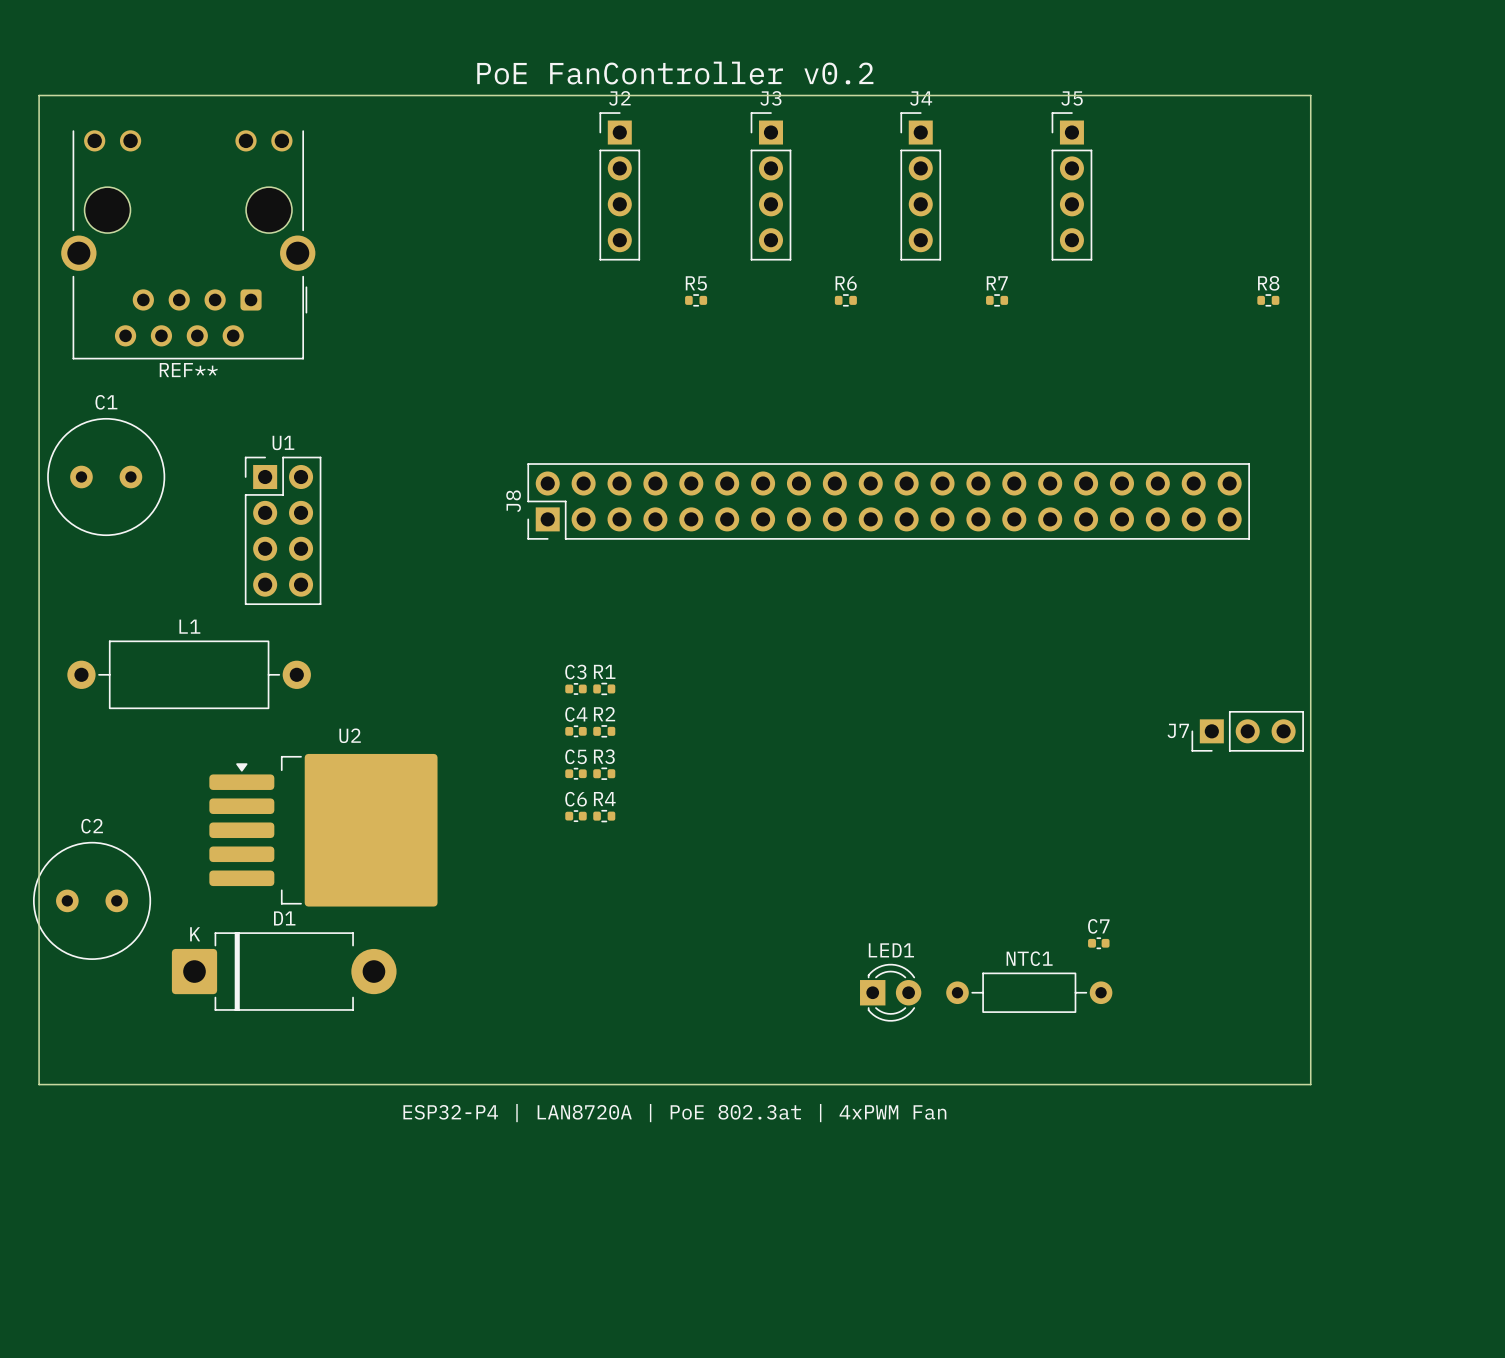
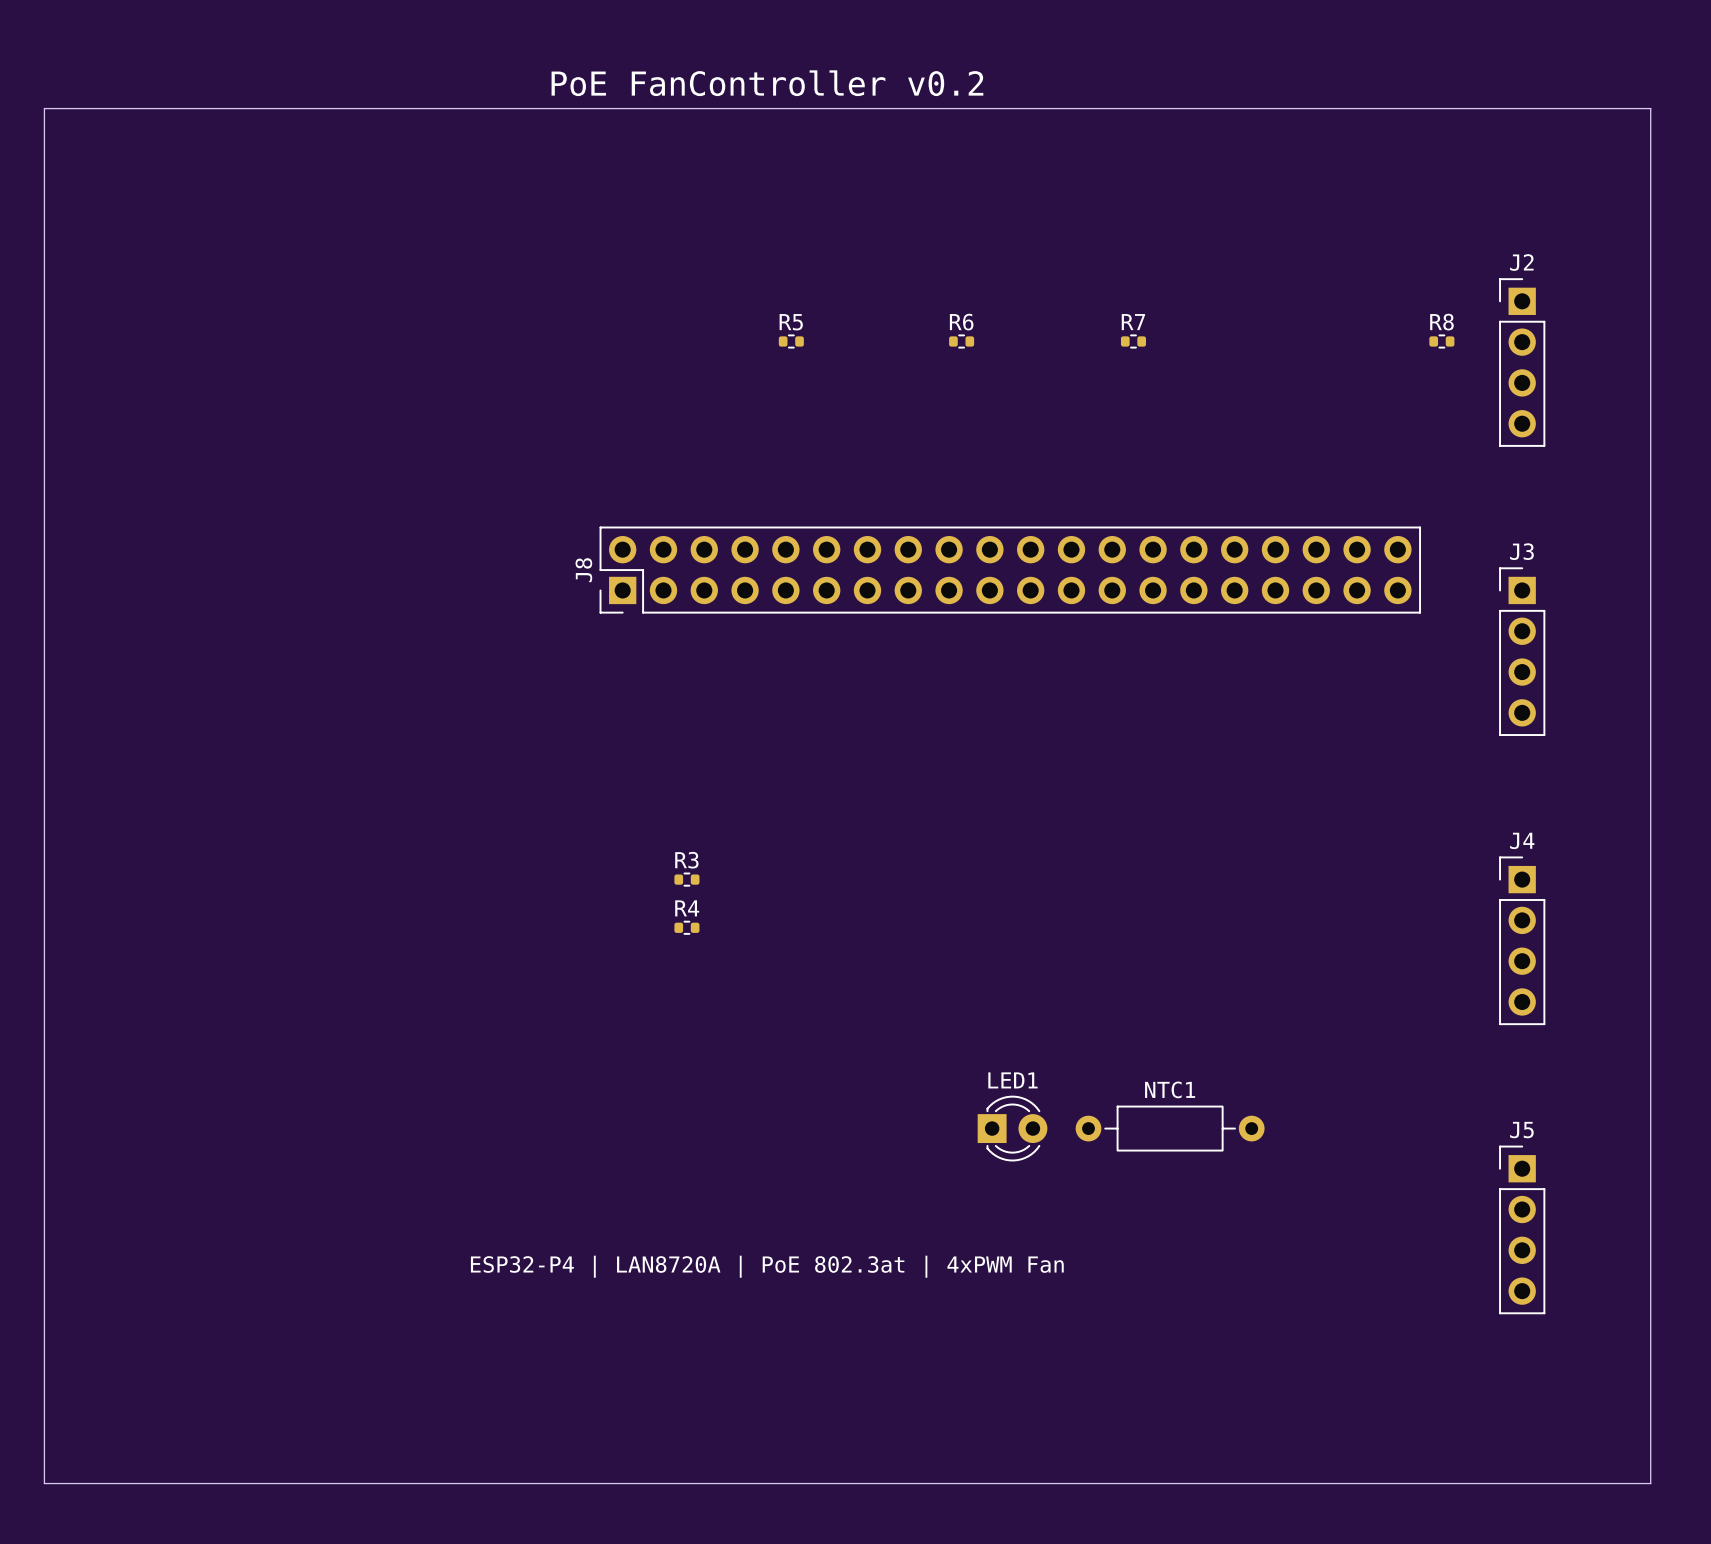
board edge: (1310, 95) (1310, 1084) (39, 1084) -> (1490, 108) (1650, 108) (1650, 1483) (44, 1483) (44, 1232)
J2 position: (619, 186) -> (1522, 362)
J3 position: (770, 186) -> (1522, 651)
J4 position: (920, 186) -> (1522, 940)
J5 position: (1071, 186) -> (1522, 1229)
REF**: (188, 244) -> none
C1: (106, 477) -> none
U1: (283, 530) -> none
L1: (189, 674) -> none
C3: (576, 688) -> none
R1: (604, 688) -> none
C4: (576, 731) -> none
R2: (604, 731) -> none
J7: (1247, 731) -> none
C5: (576, 773) -> none
C6: (576, 816) -> none
U2: (323, 830) -> none
C2: (92, 900) -> none
C7: (1098, 943) -> none
D1: (284, 971) -> none

